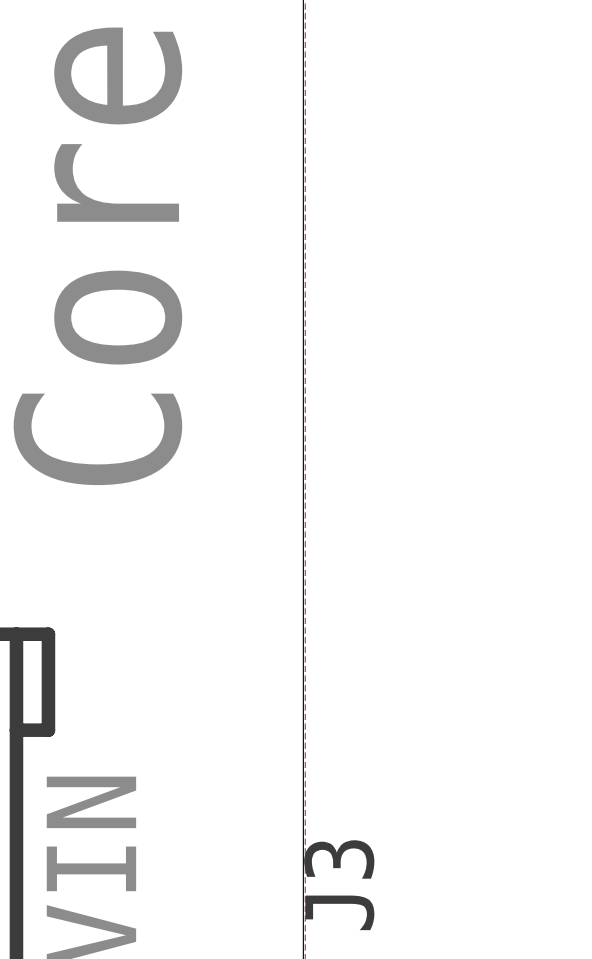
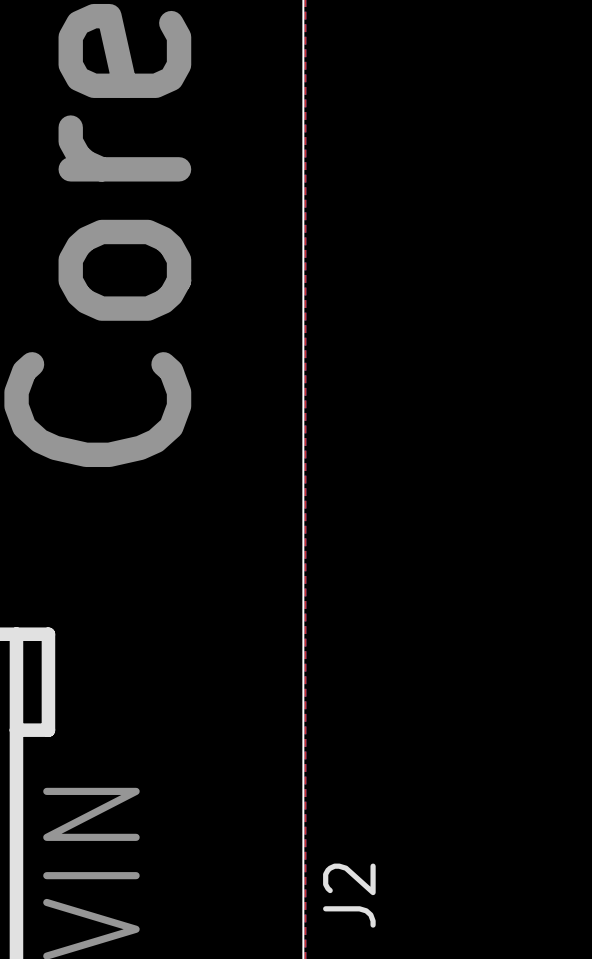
J3 name: J3 (339, 885) -> J2 (349, 895)

